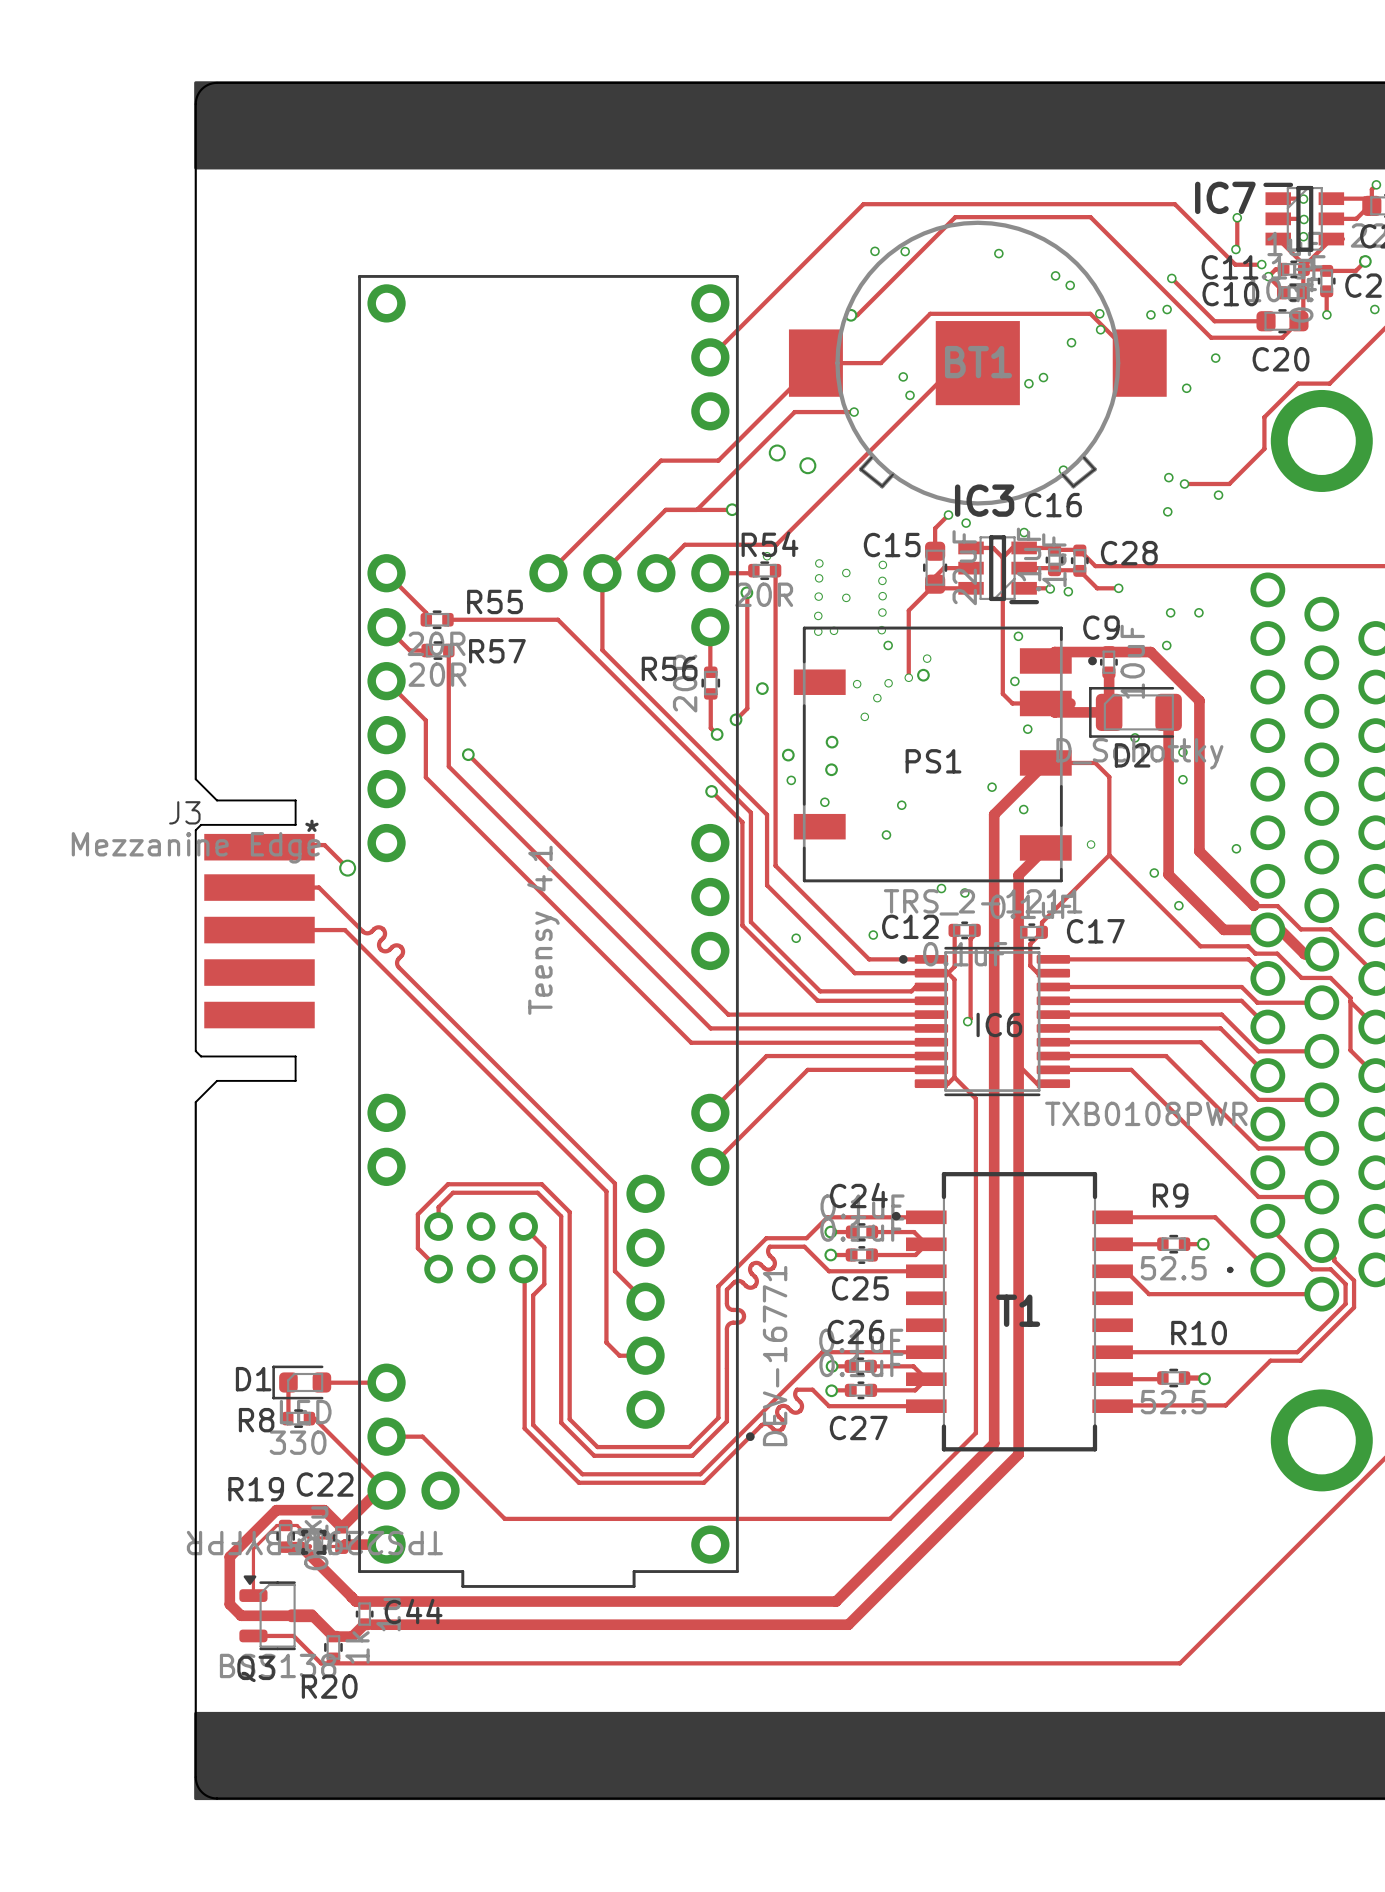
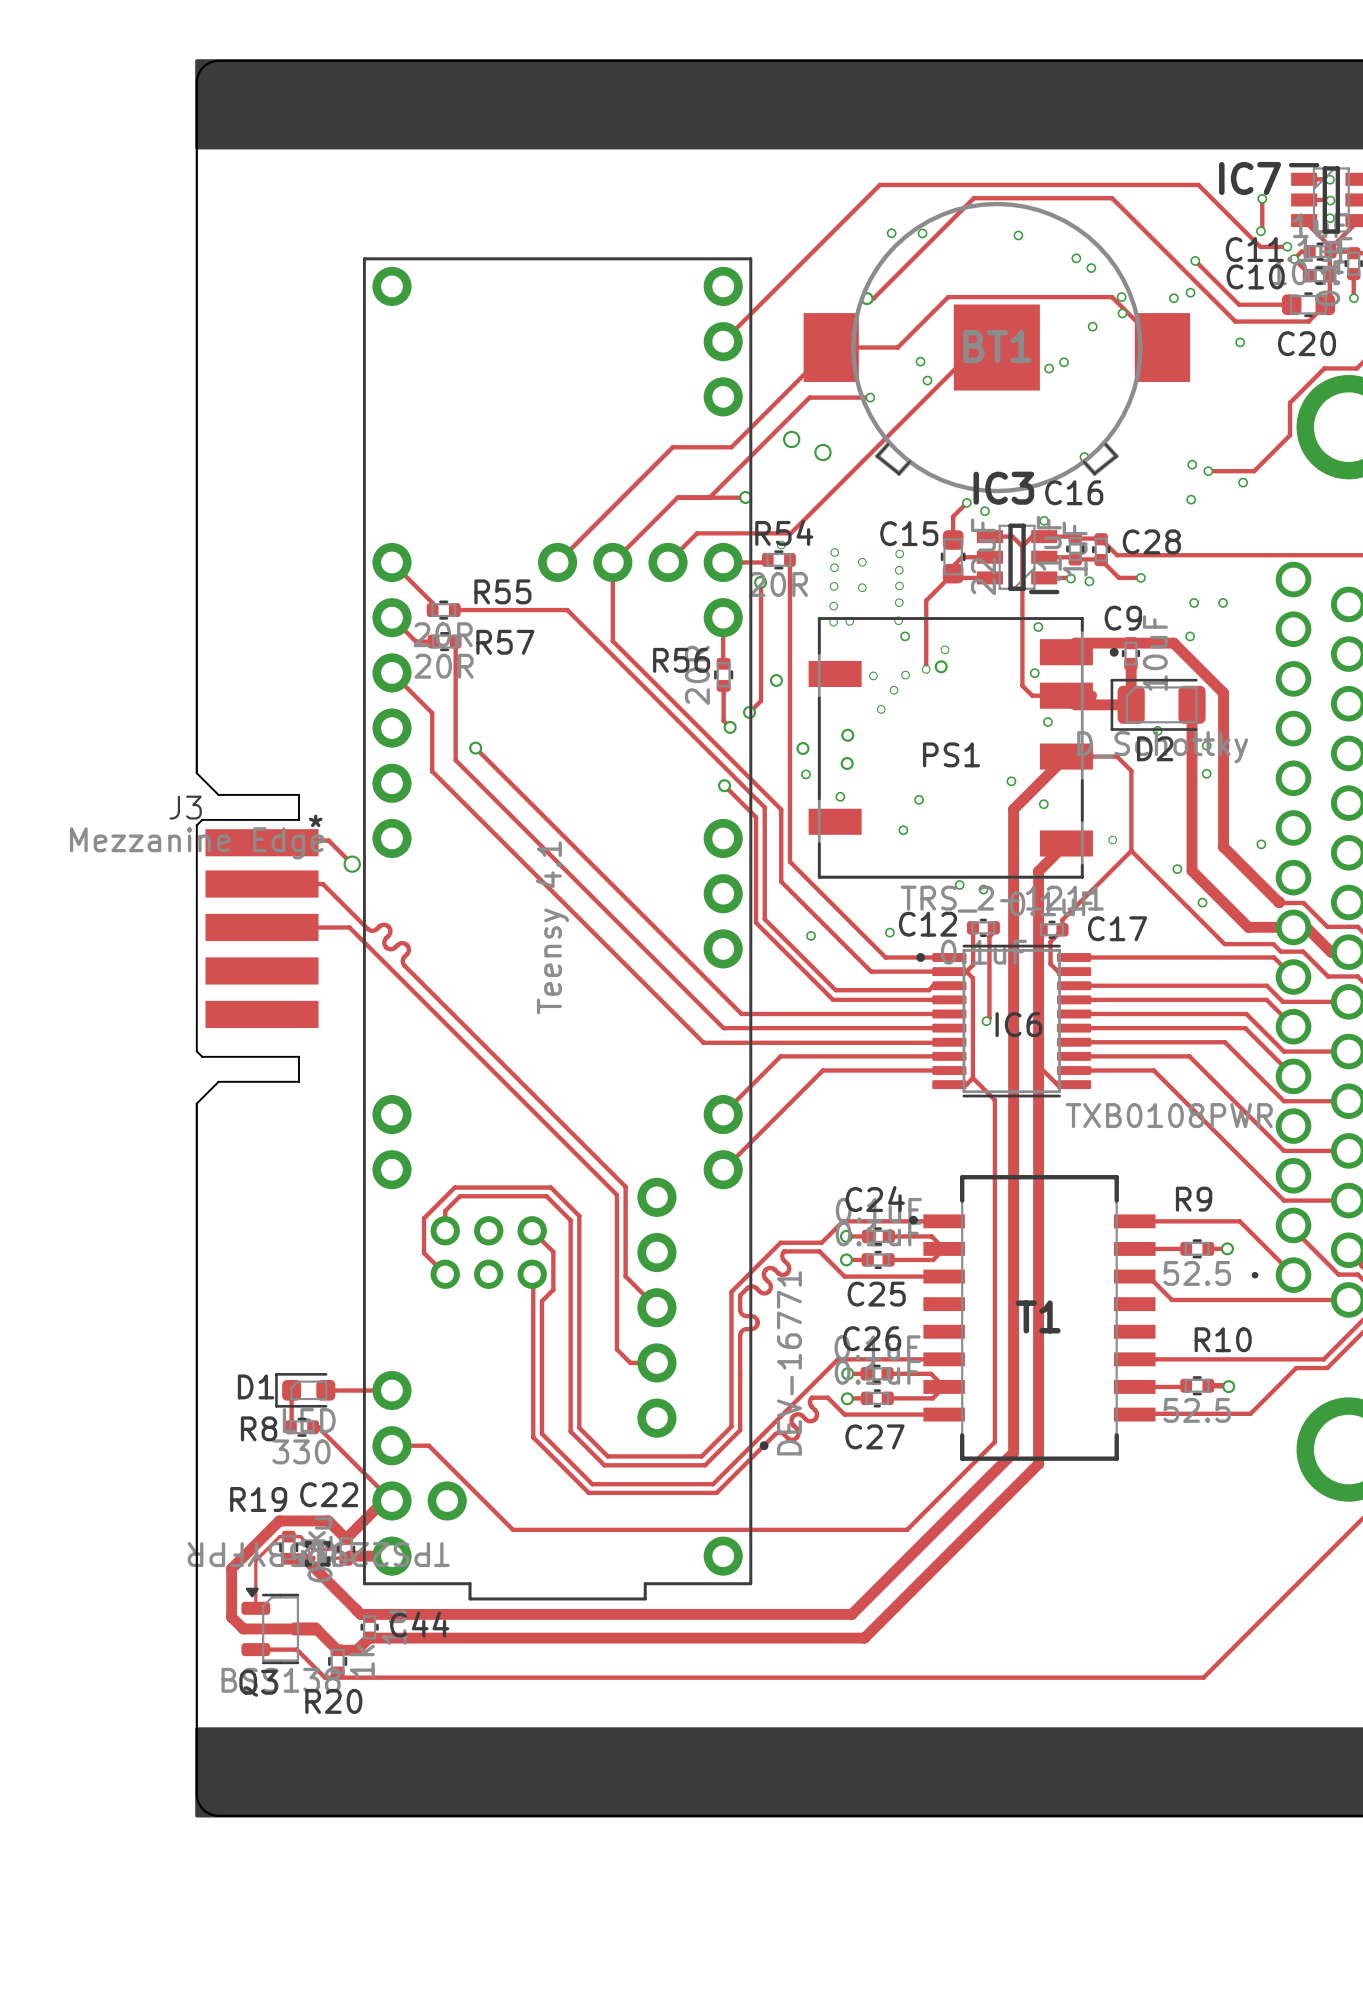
via: (1186, 388) -> none

